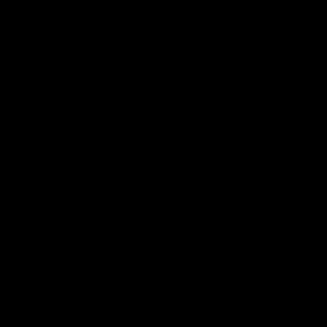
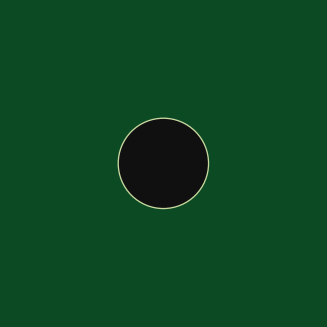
part: none -> (163, 163)

